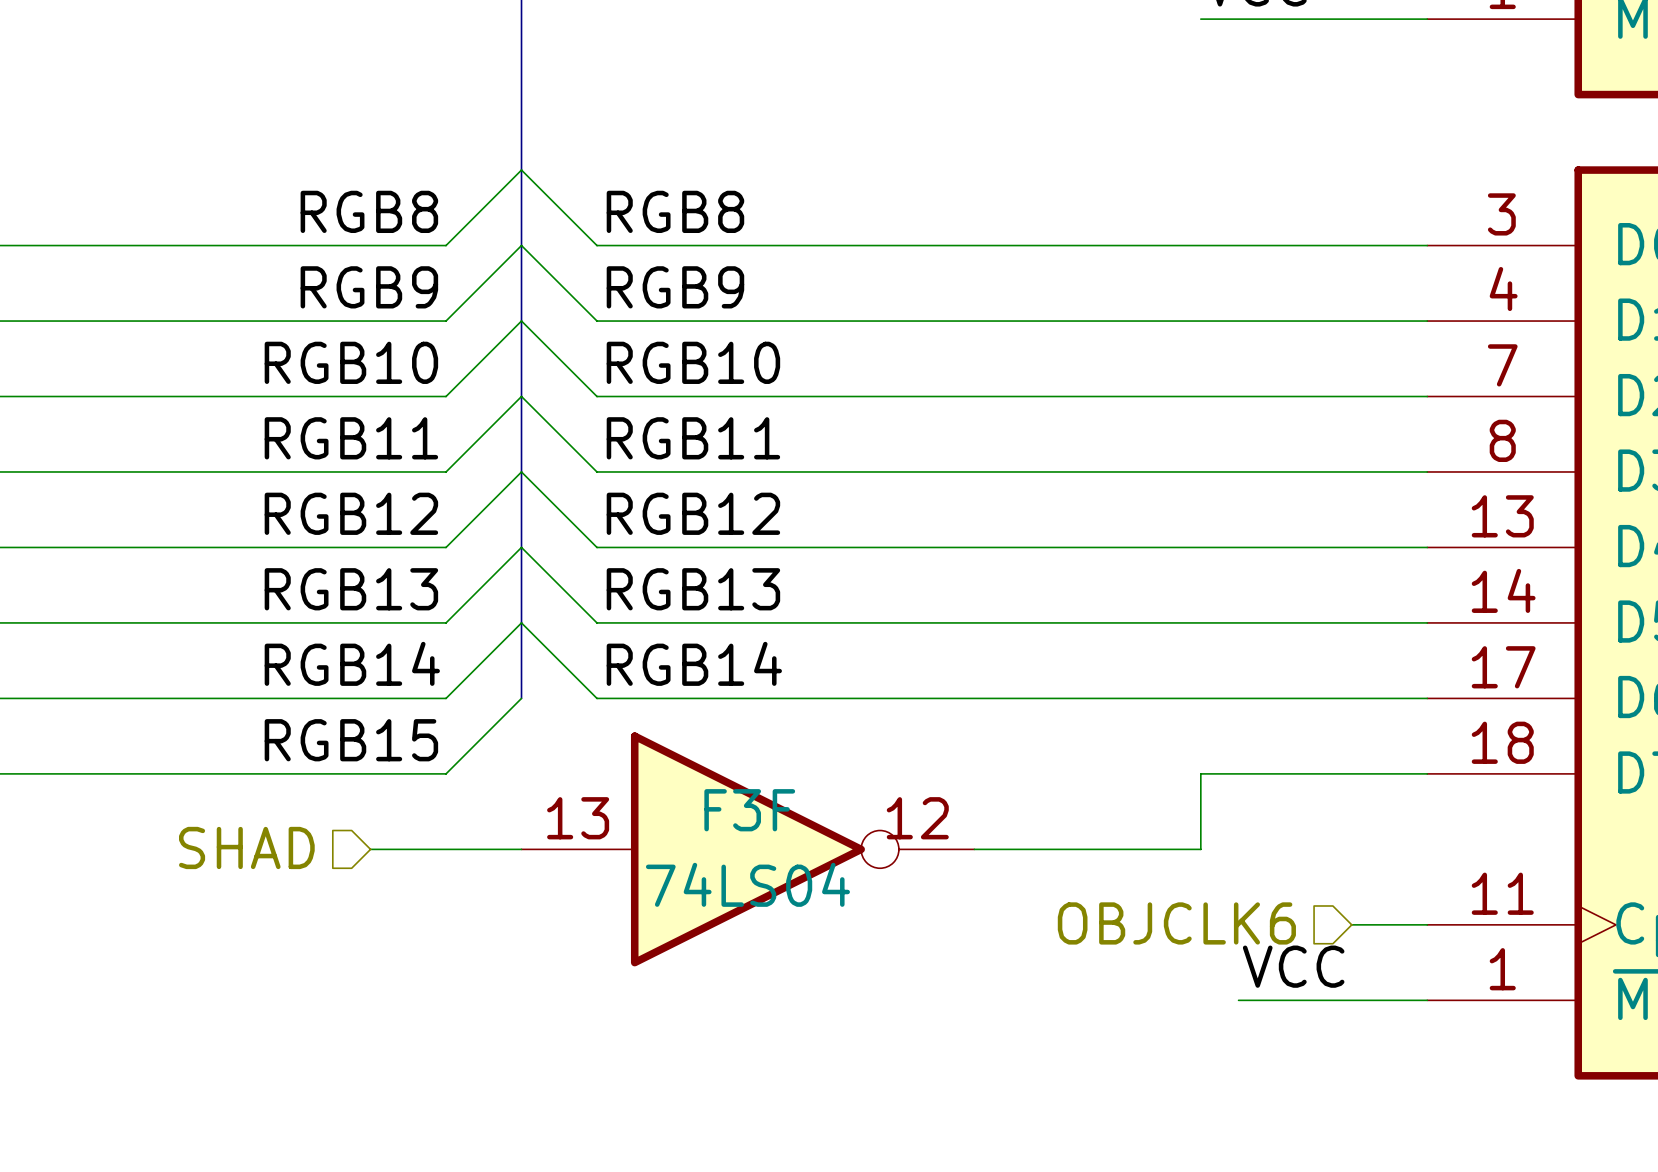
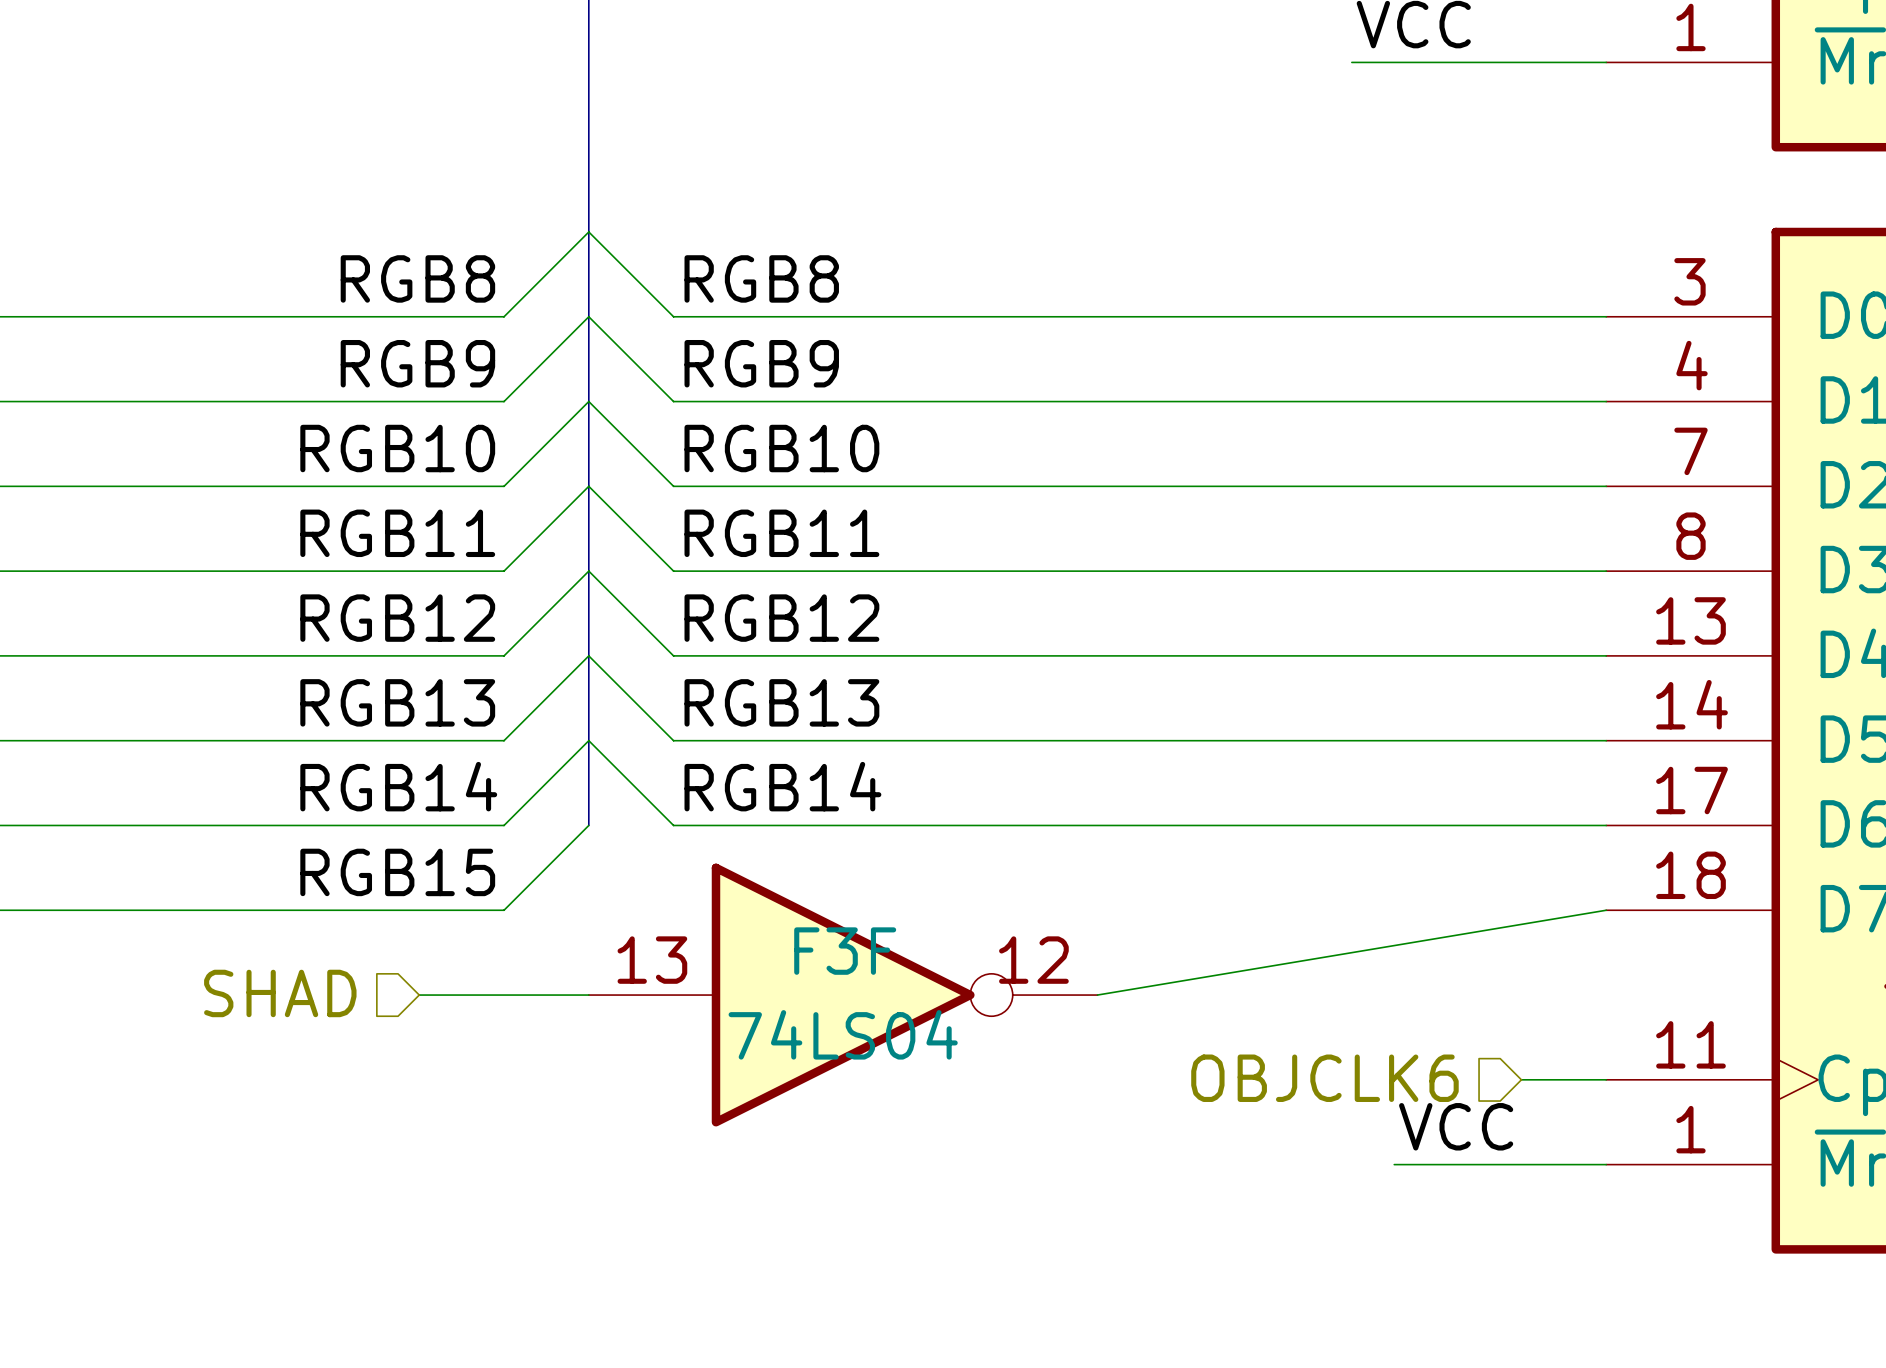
wire: (1427, 773) (1200, 773) (1200, 849) (974, 849) -> (1606, 910) (1097, 995)

